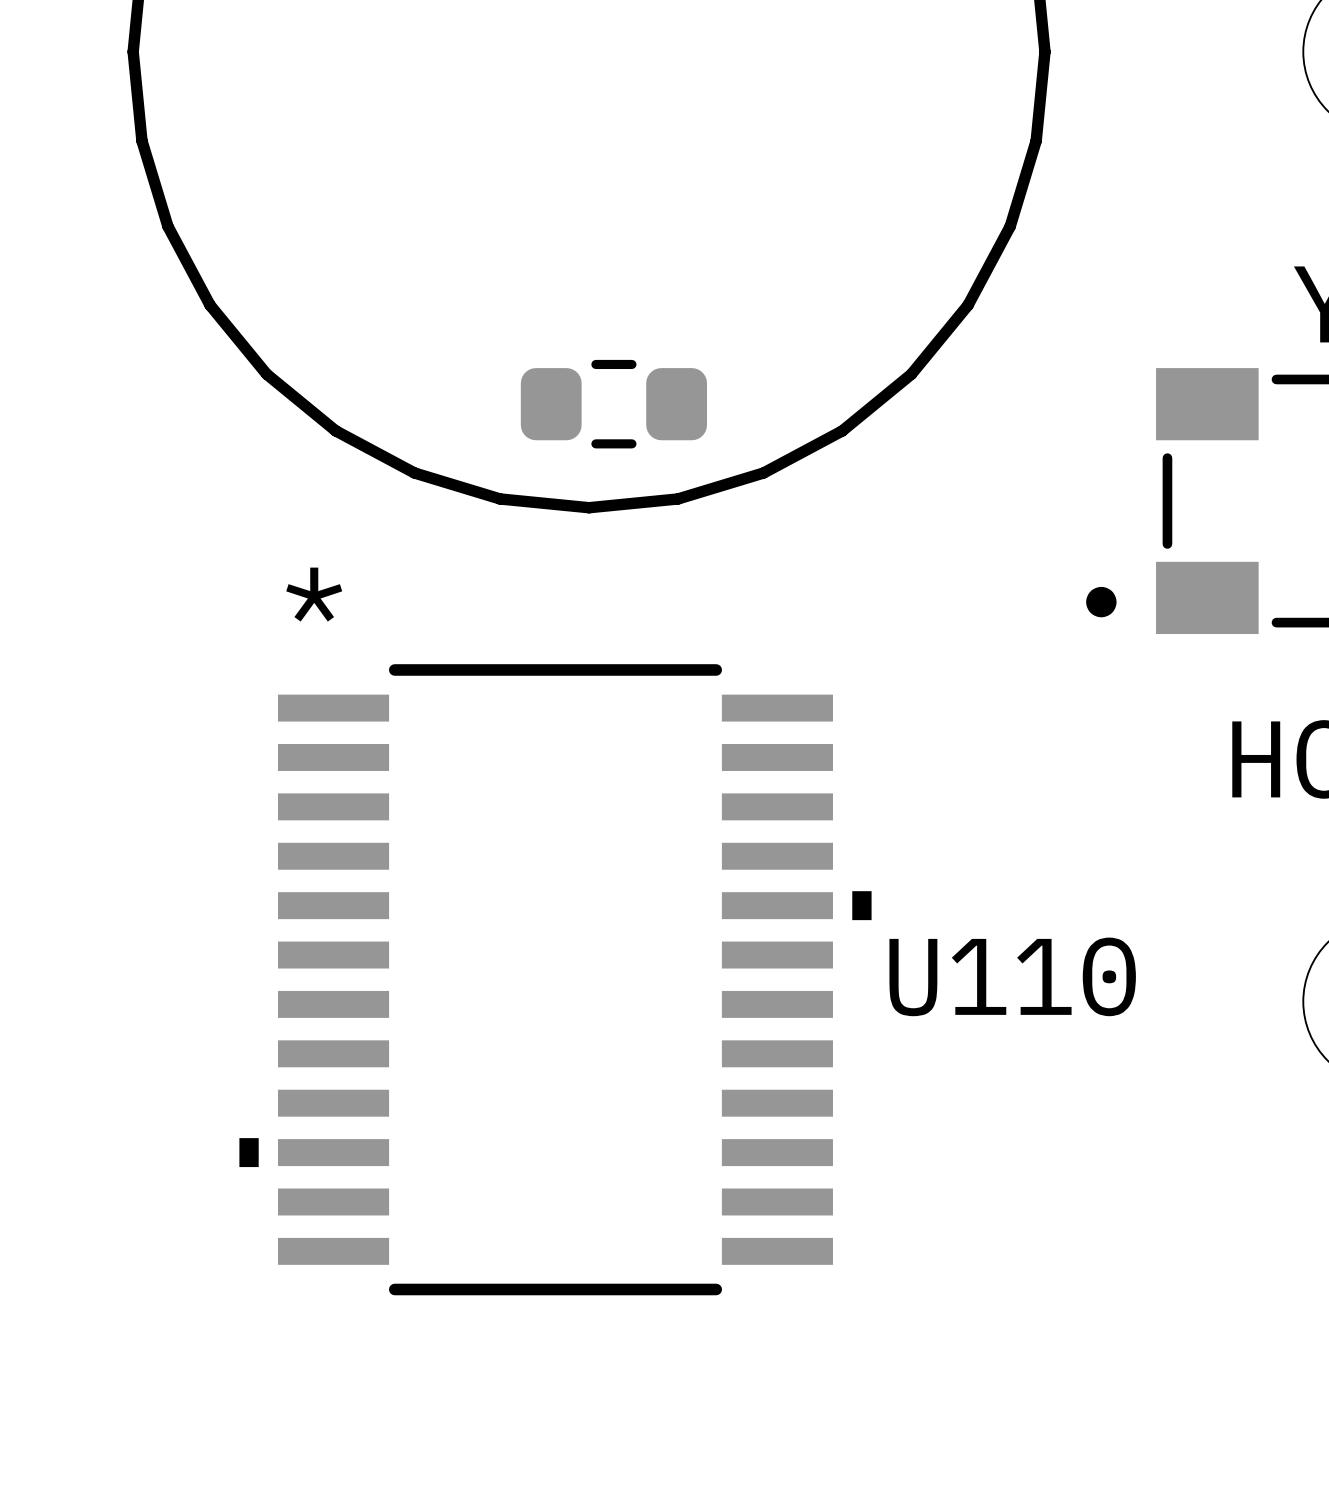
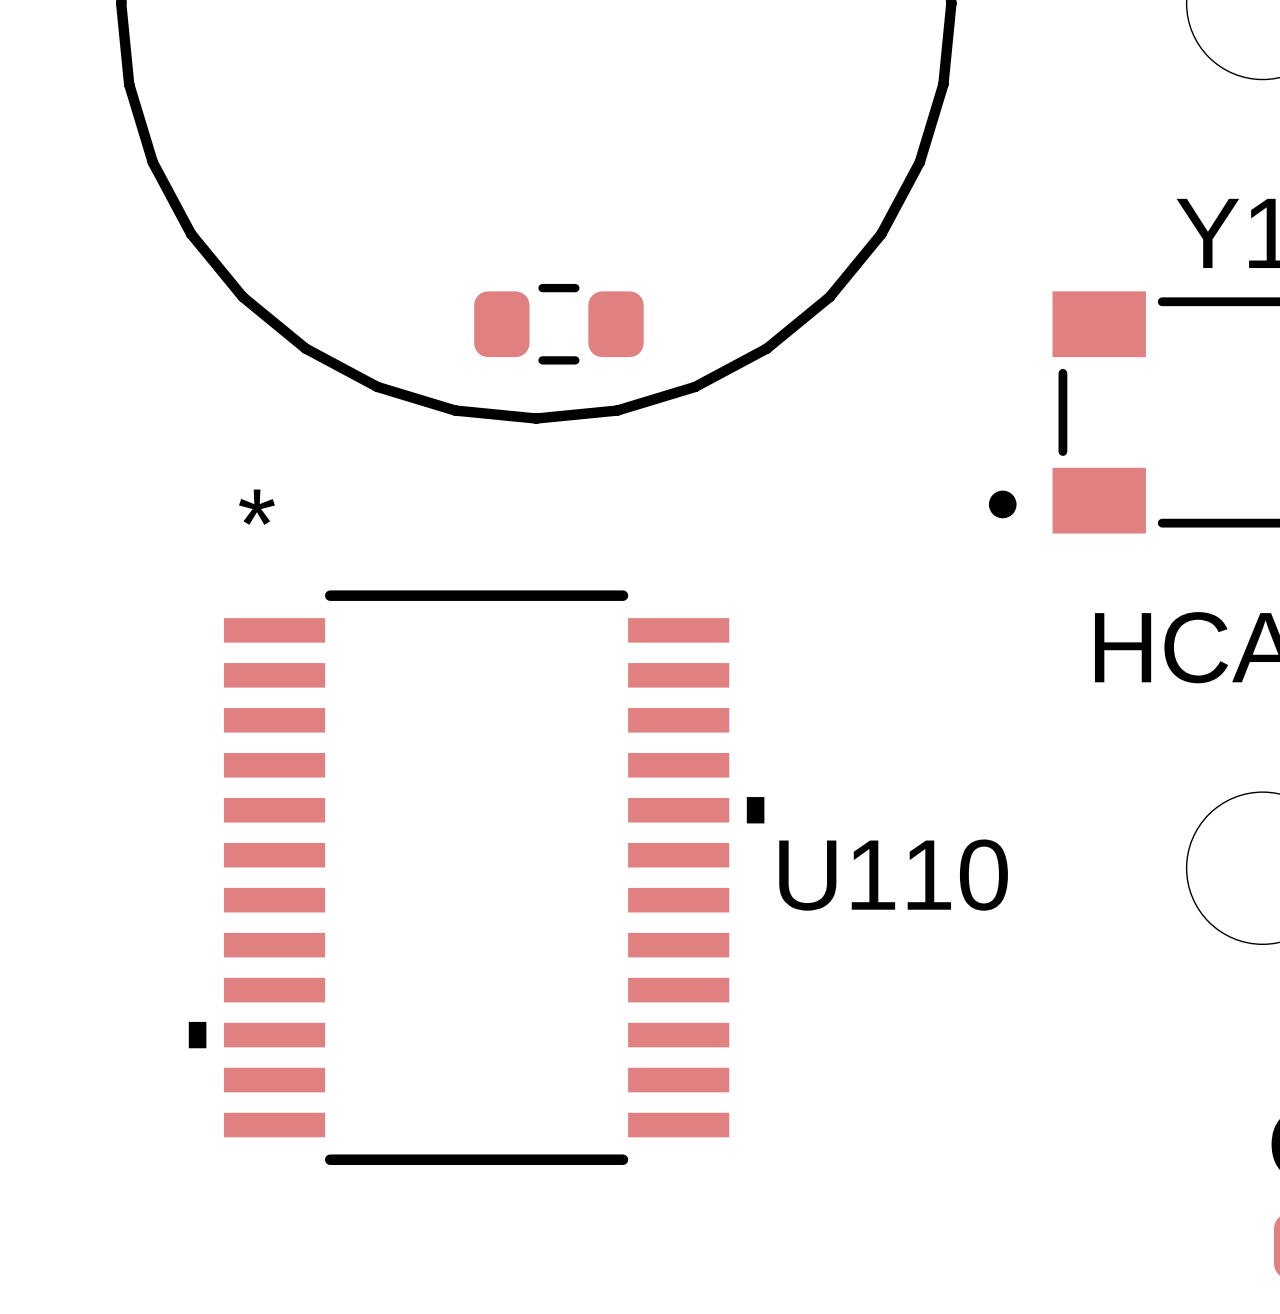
U110 position: (555, 979) -> (476, 877)

